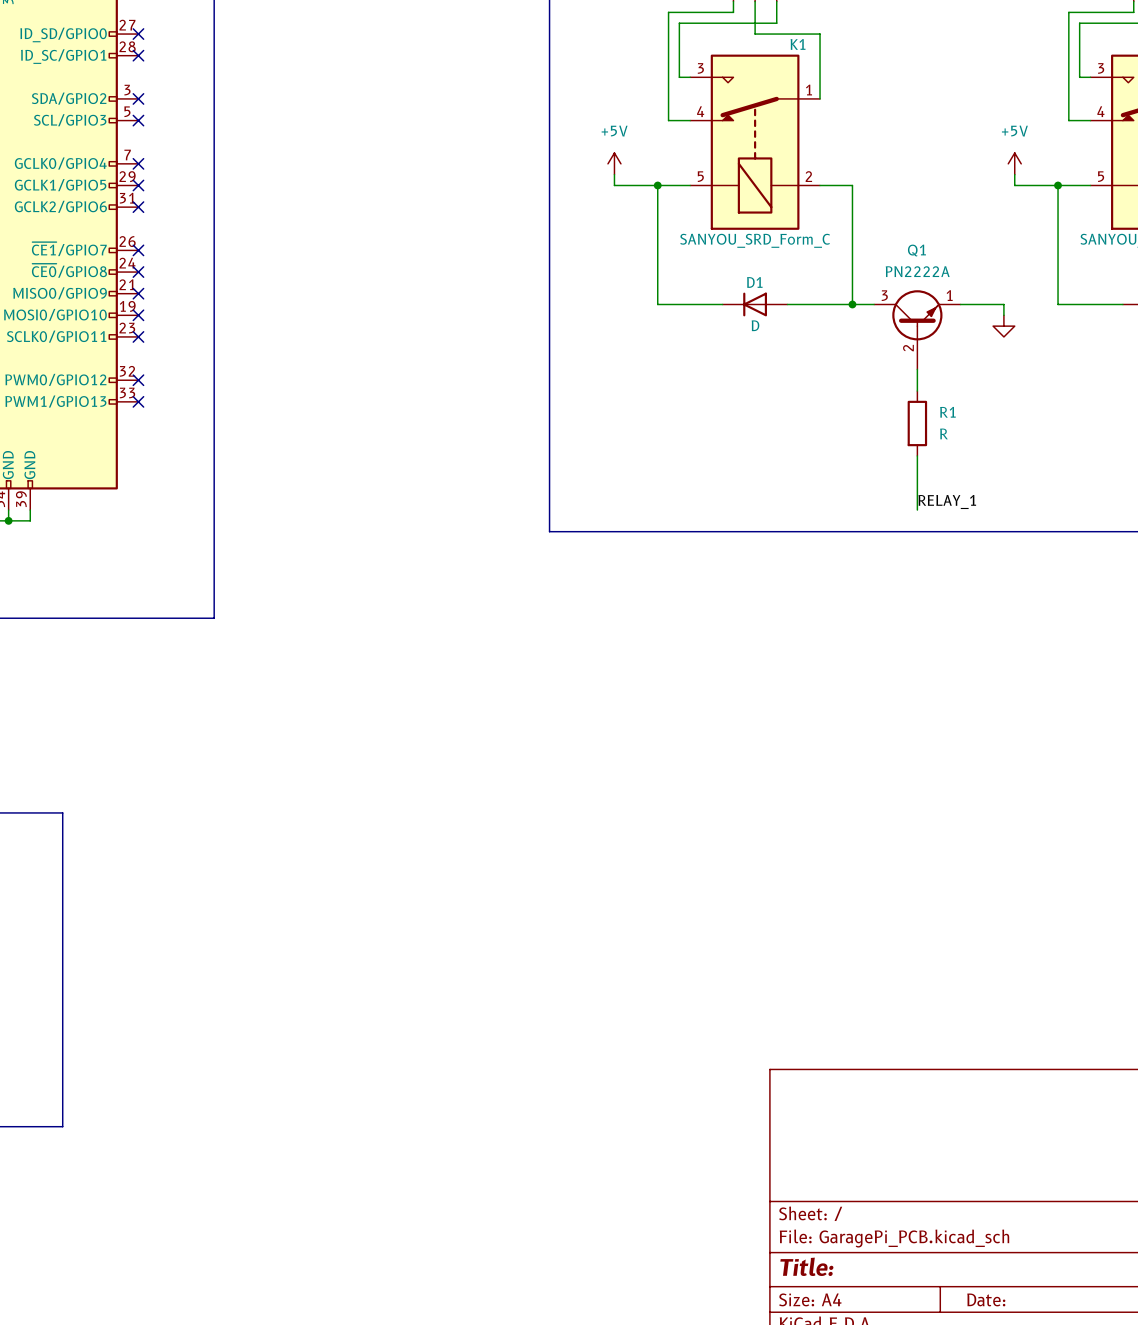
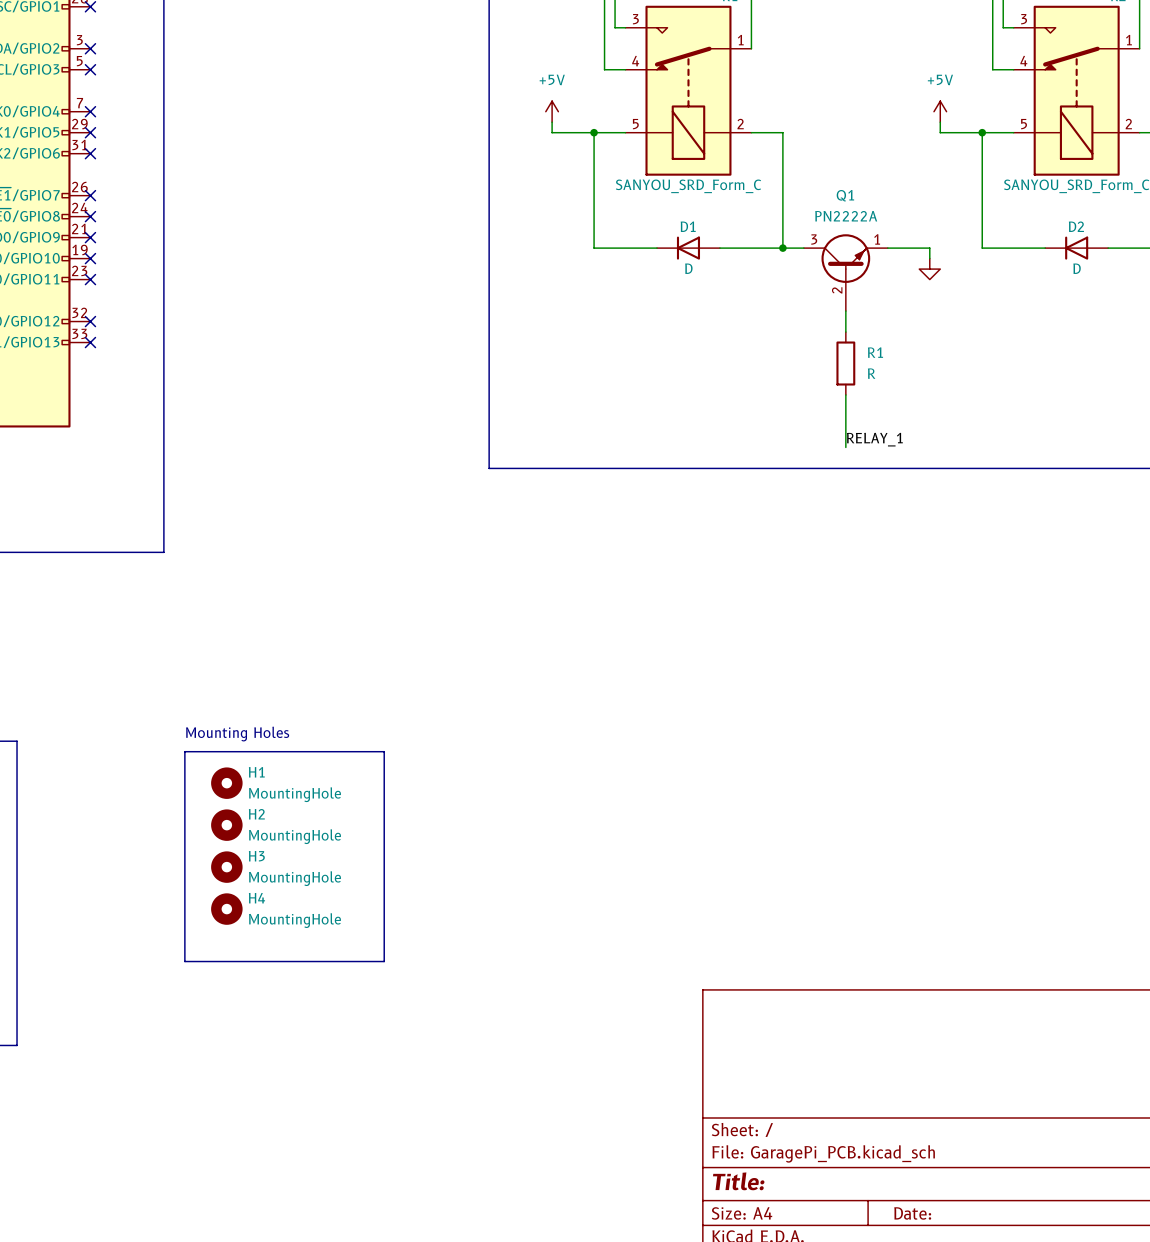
text: none -> Mounting Holes (237, 734)
line: none -> (184, 751) (184, 961) (384, 961) (384, 751) (184, 751)
H1: none -> MountingHole (226, 783)
H2: none -> MountingHole (226, 825)
H3: none -> MountingHole (226, 867)
H4: none -> MountingHole (226, 909)

